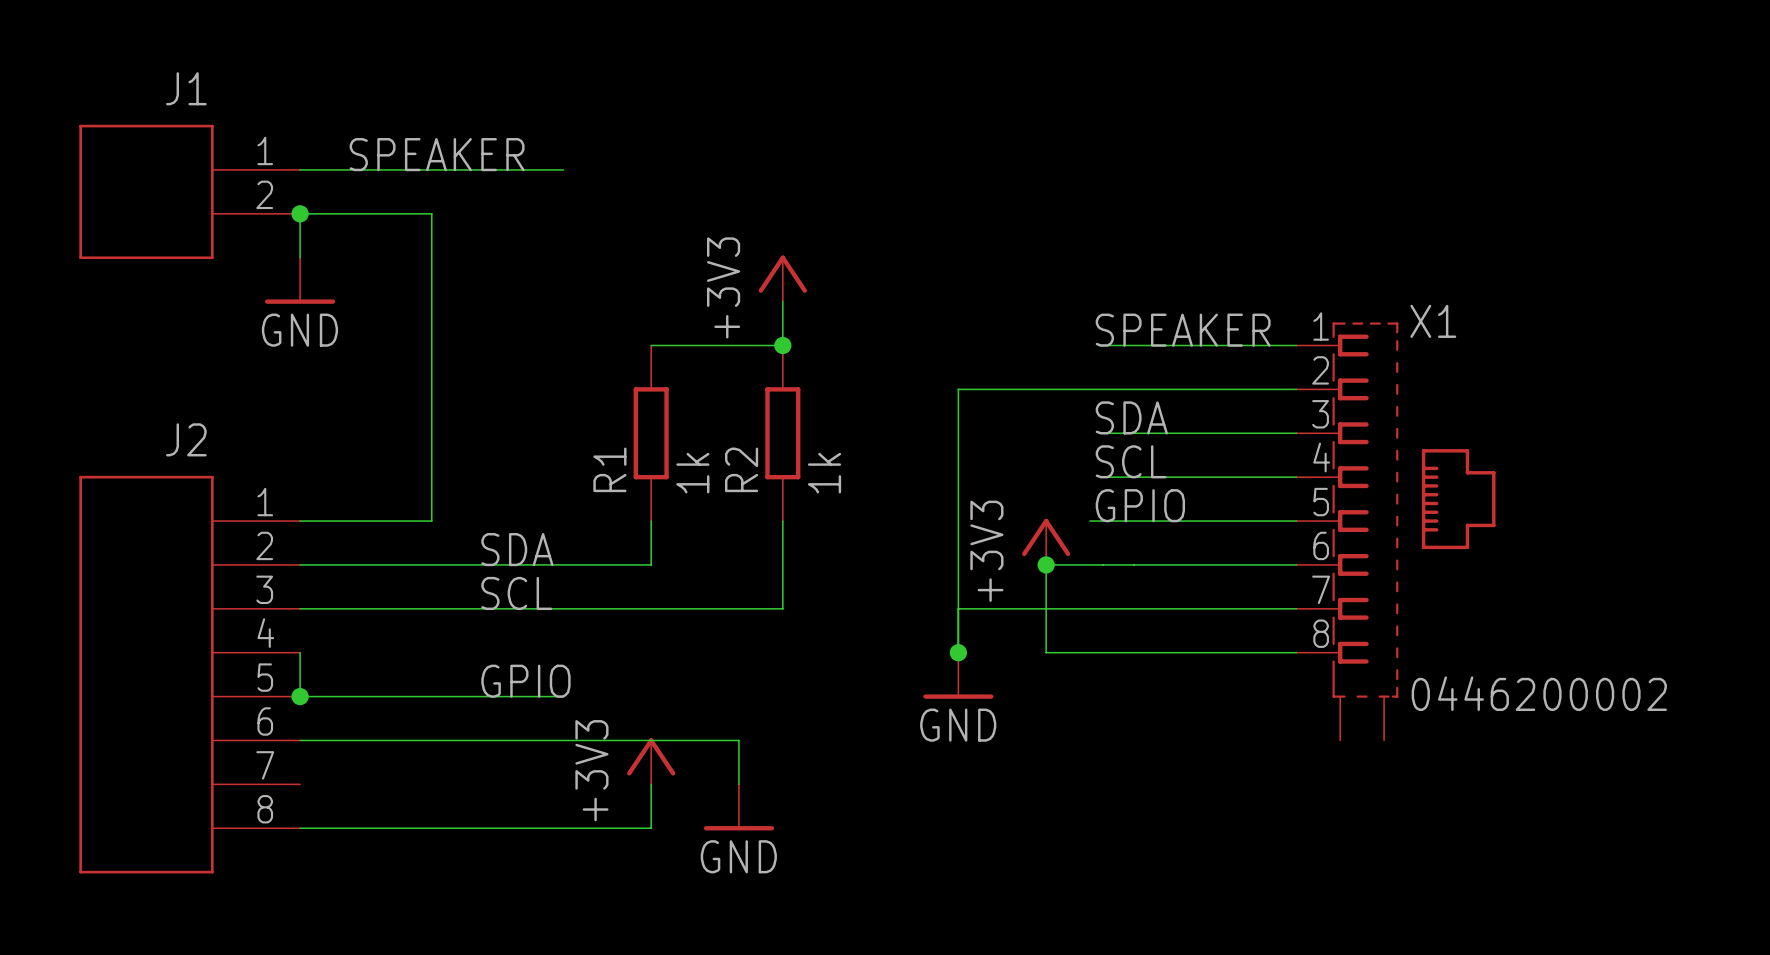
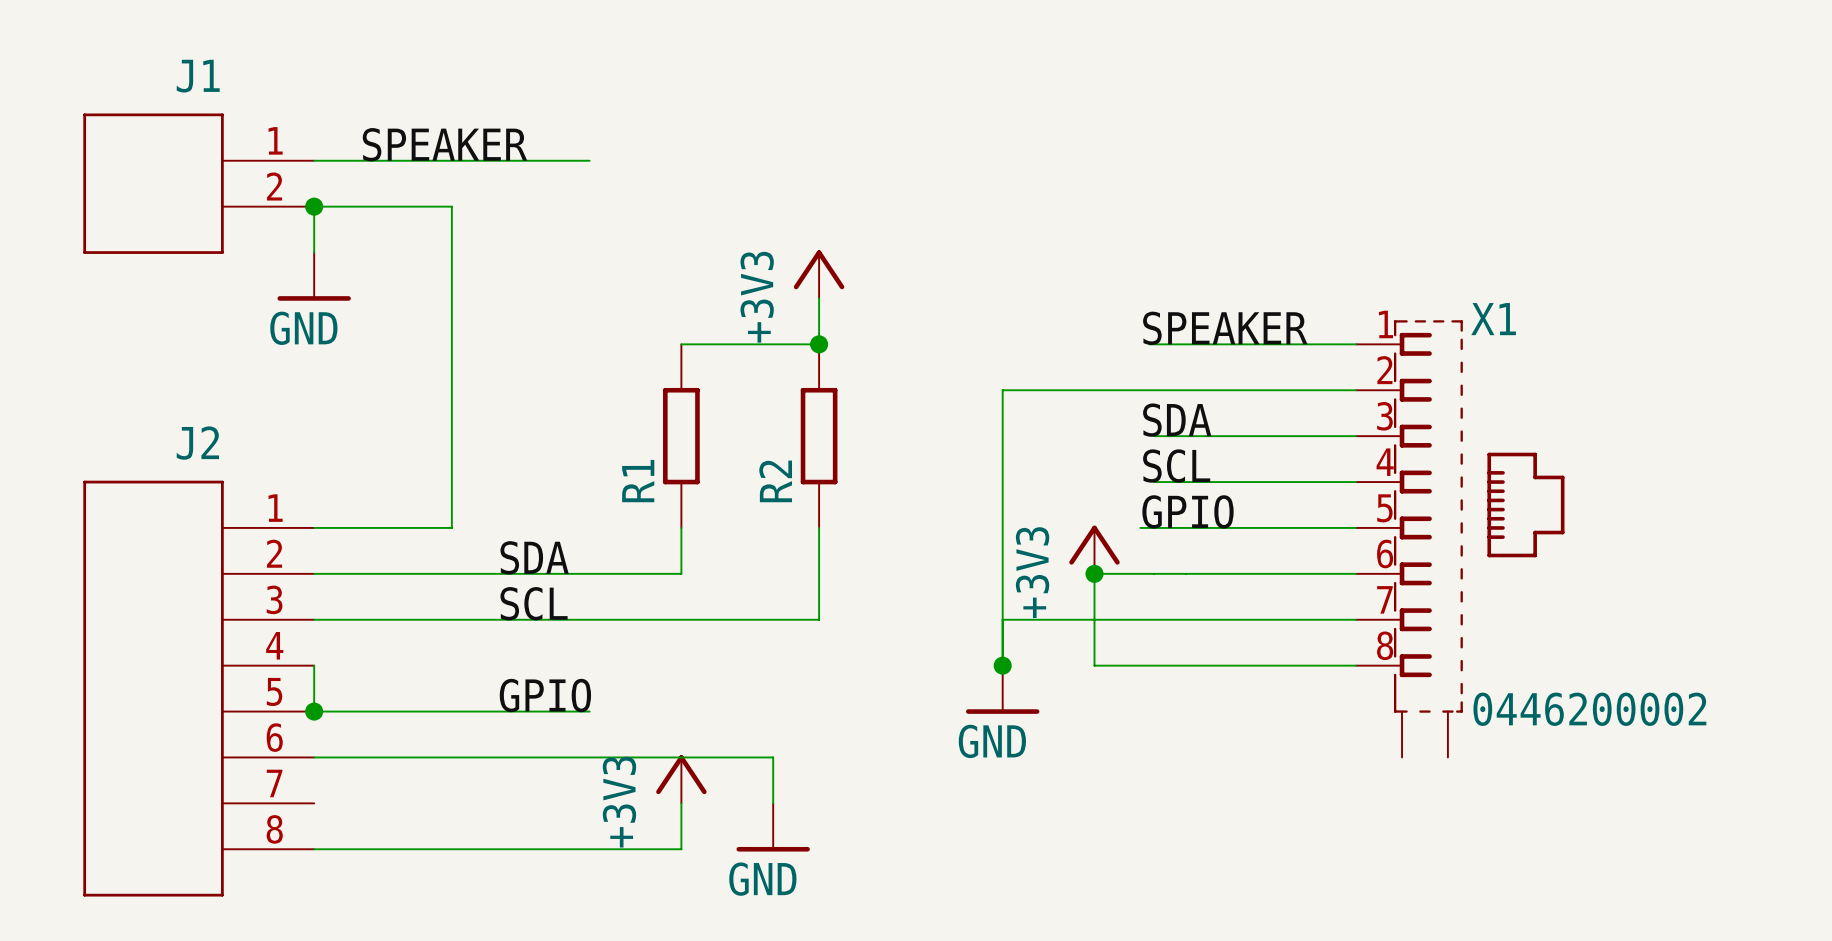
R1 value: 1k (692, 473) -> none
R2 value: 1k (824, 473) -> none

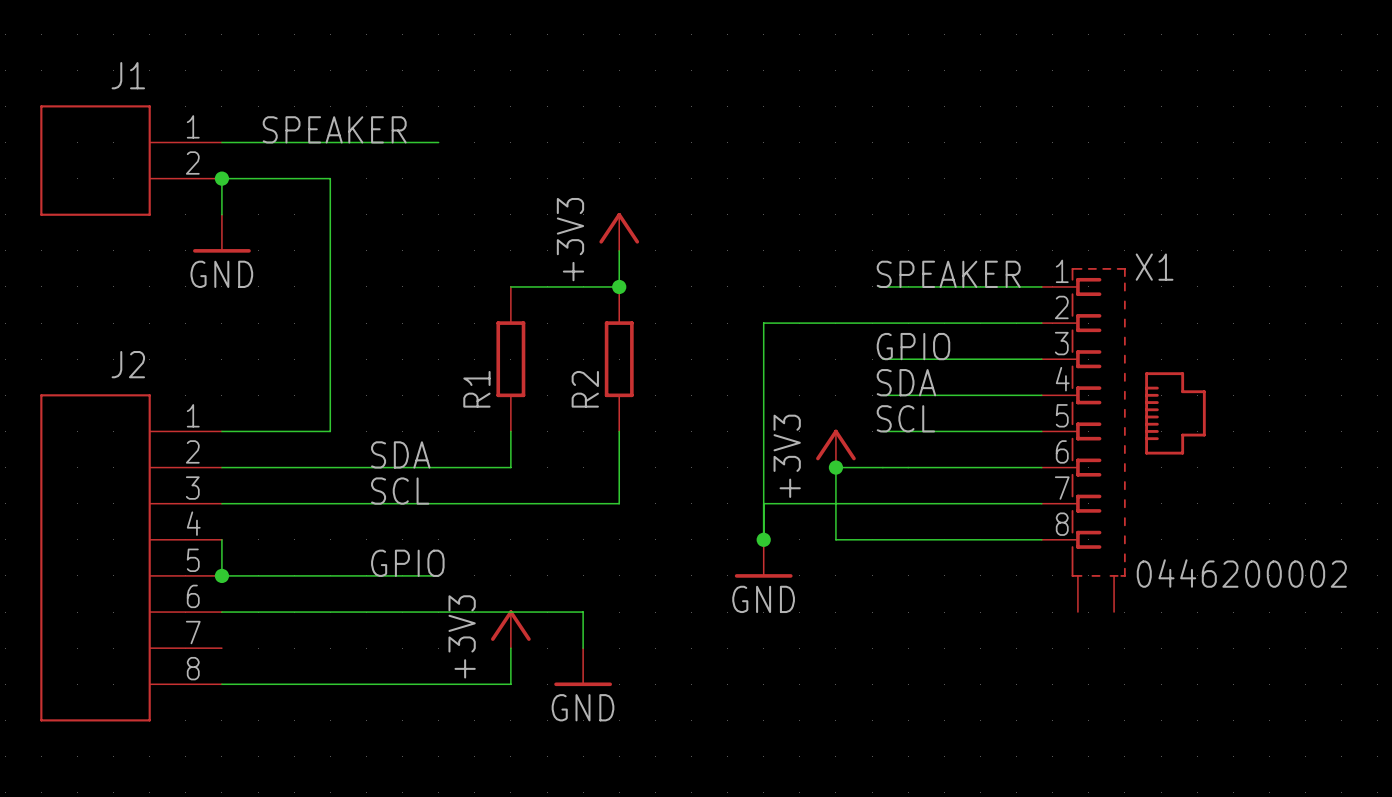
label: SDA (1177, 420) -> GPIO (913, 346)
label: SCL (1176, 466) -> SDA (906, 382)
label: GPIO (1188, 511) -> SCL (905, 418)
wire: (1140, 527) (1154, 527) -> none

